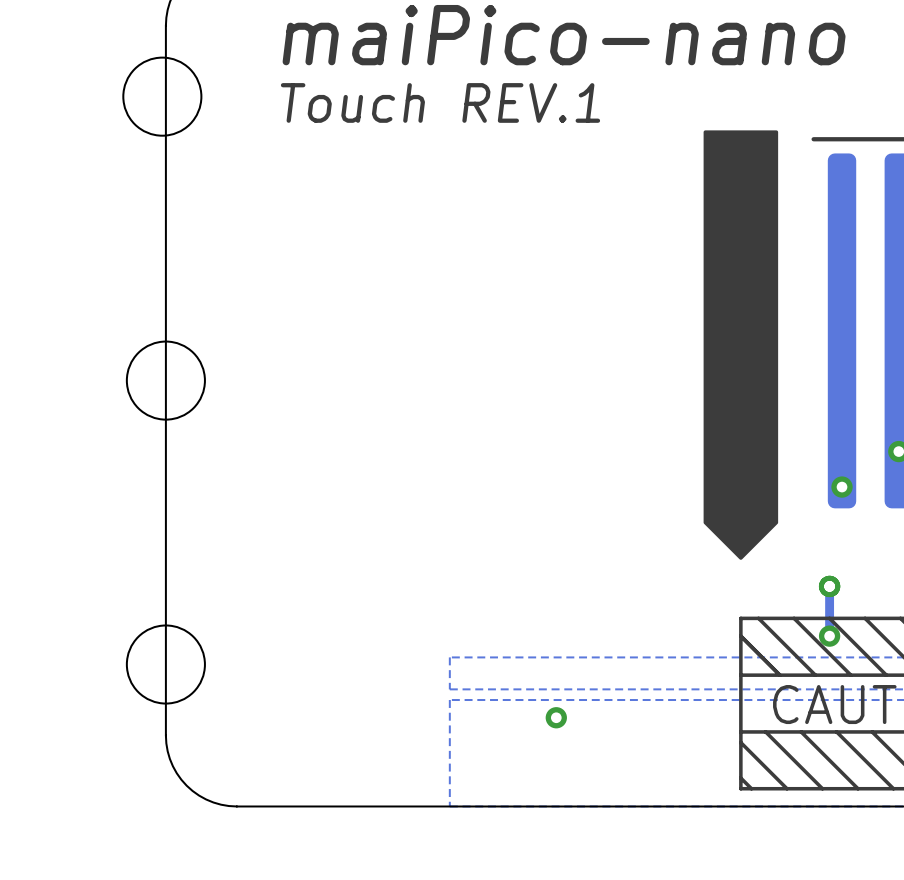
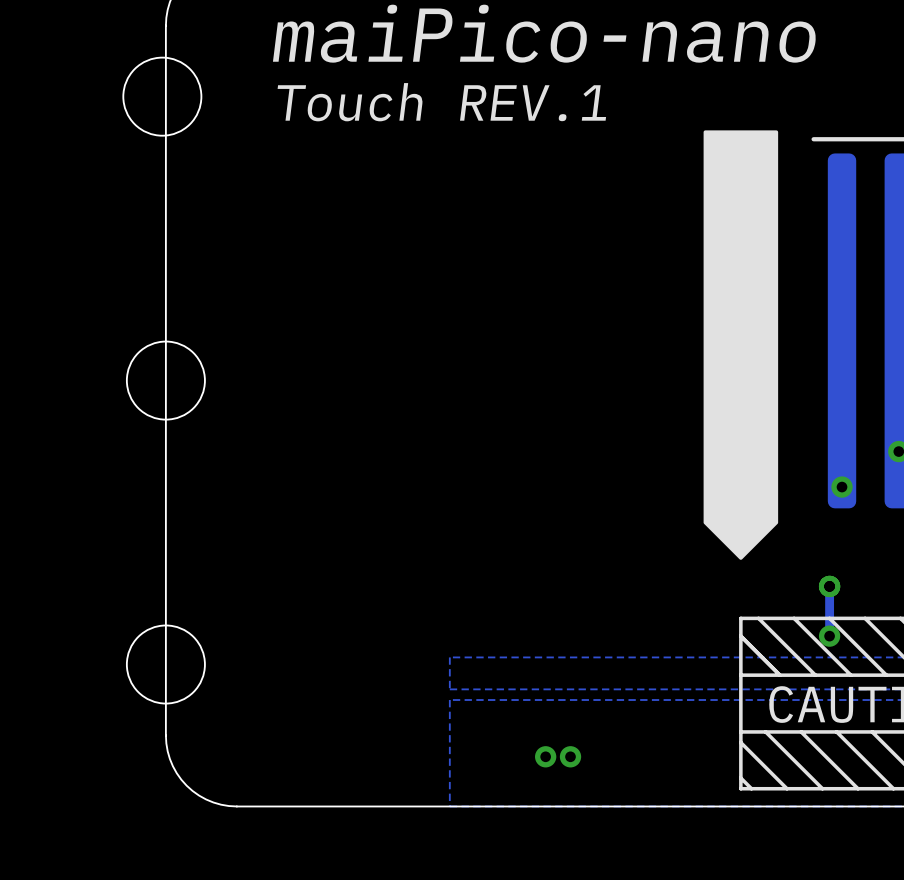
via: (556, 717) -> none
via: none -> (545, 756)
via: none -> (570, 756)

